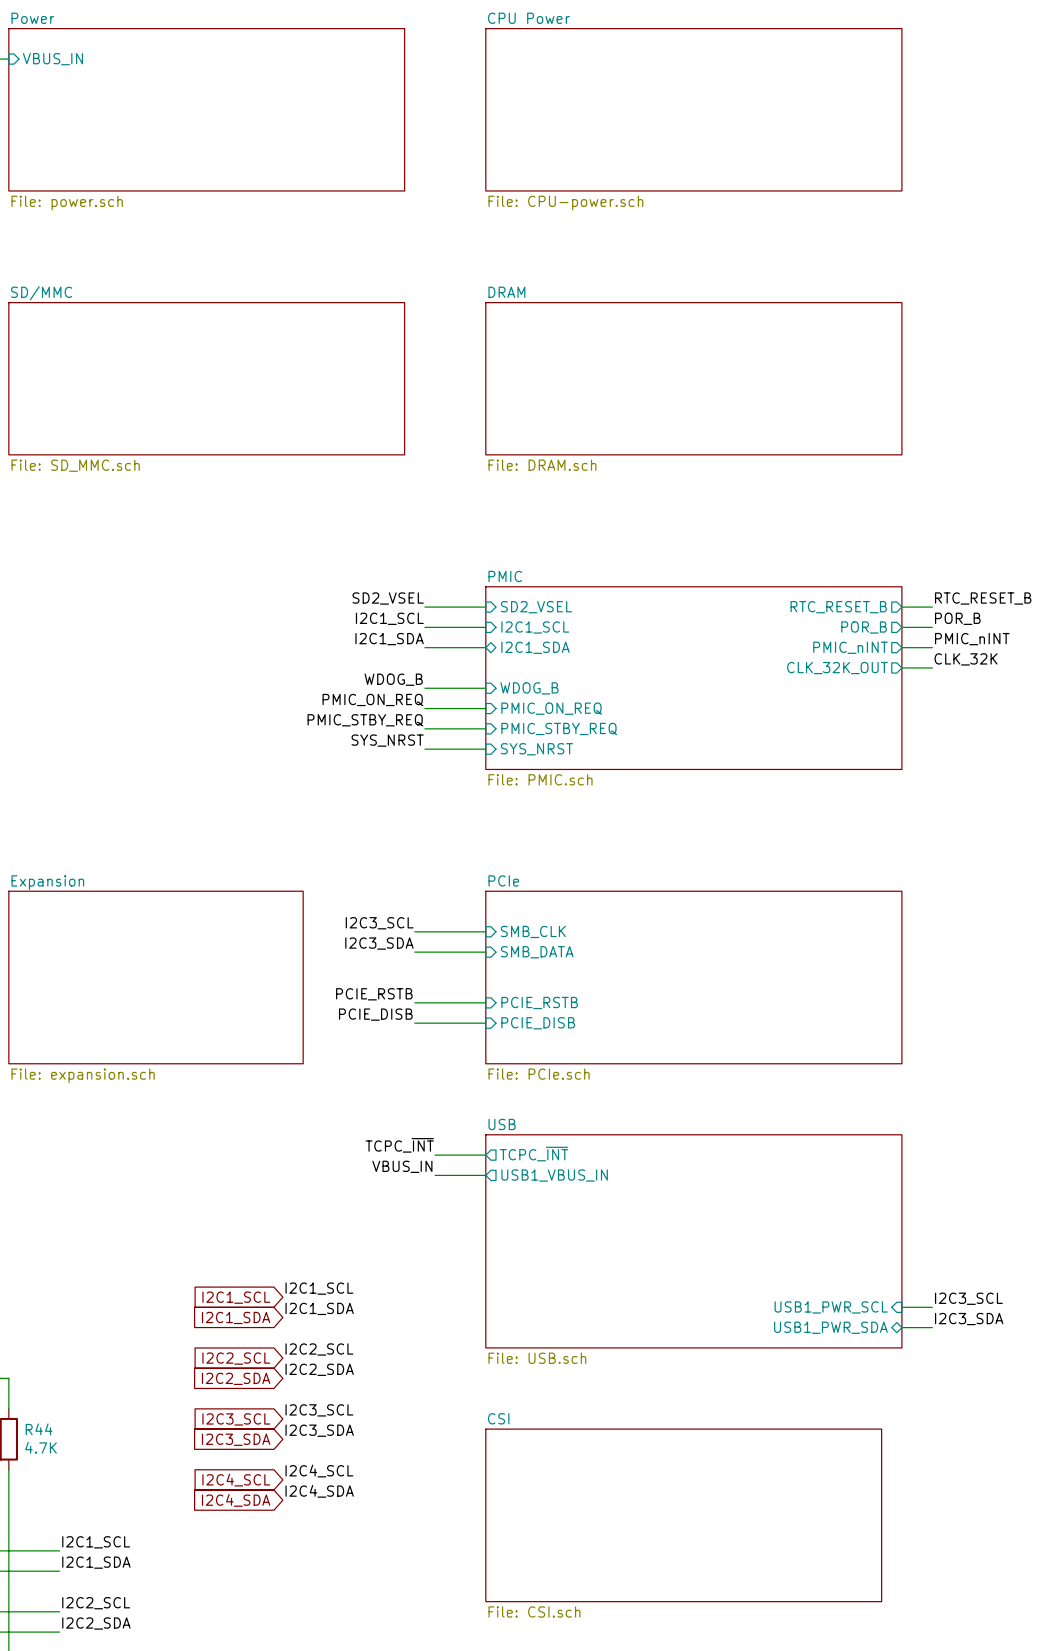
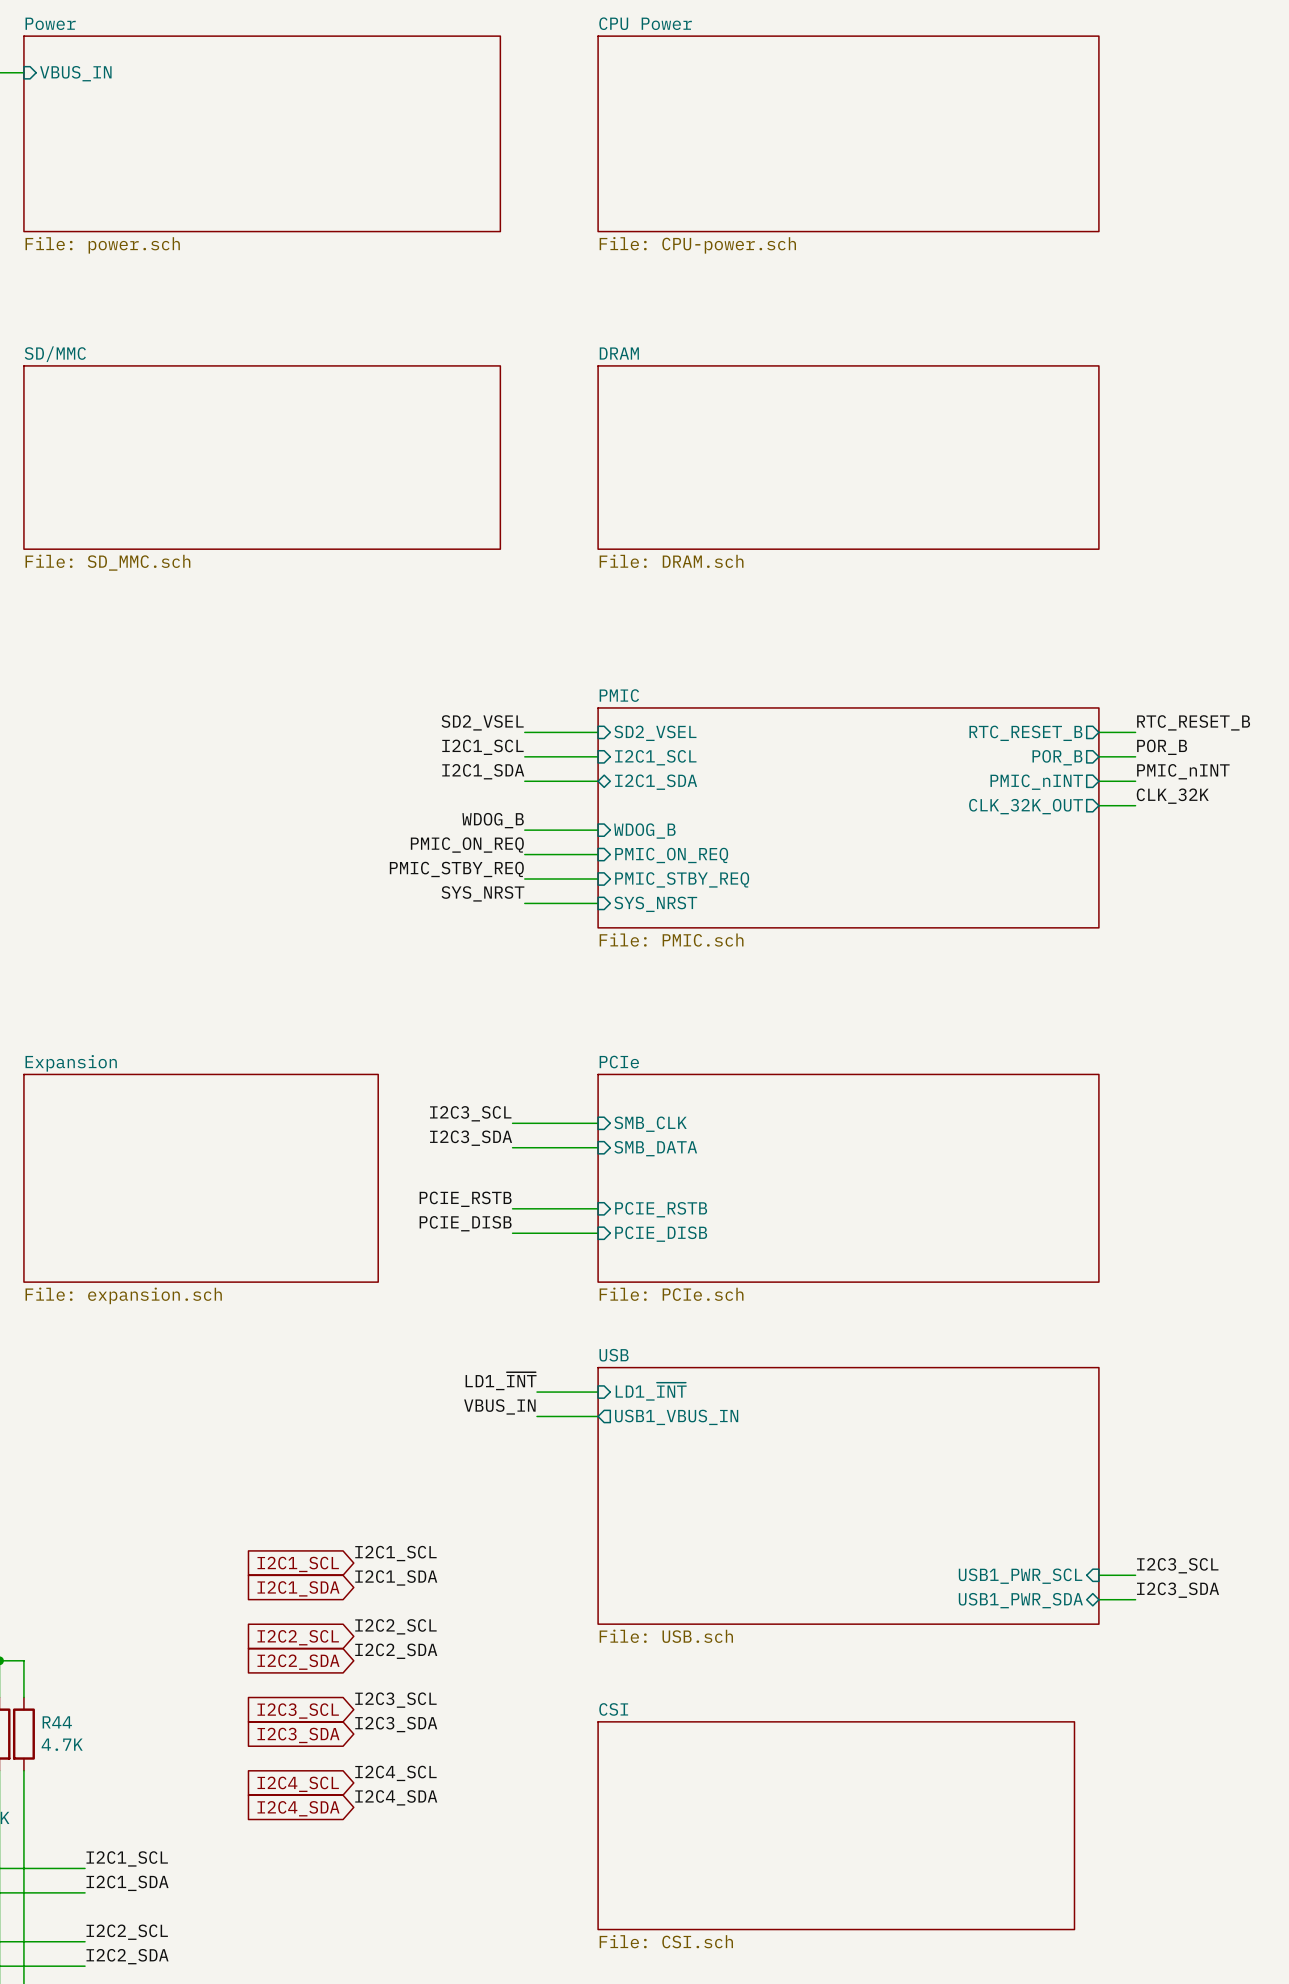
label: TCPC_~{INT} (399, 1145) -> LD1_~{INT} (501, 1381)
sheet pin shape: output (534, 1154) -> input (651, 1391)
sheet pin: TCPC_~{INT} (534, 1154) -> LD1_~{INT} (651, 1391)

